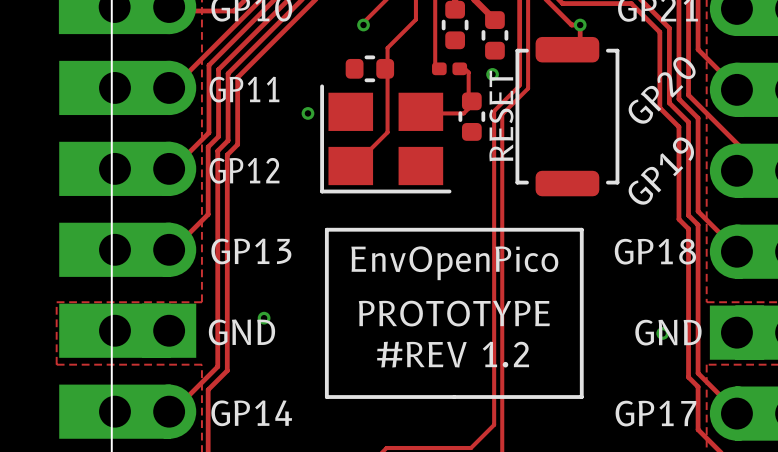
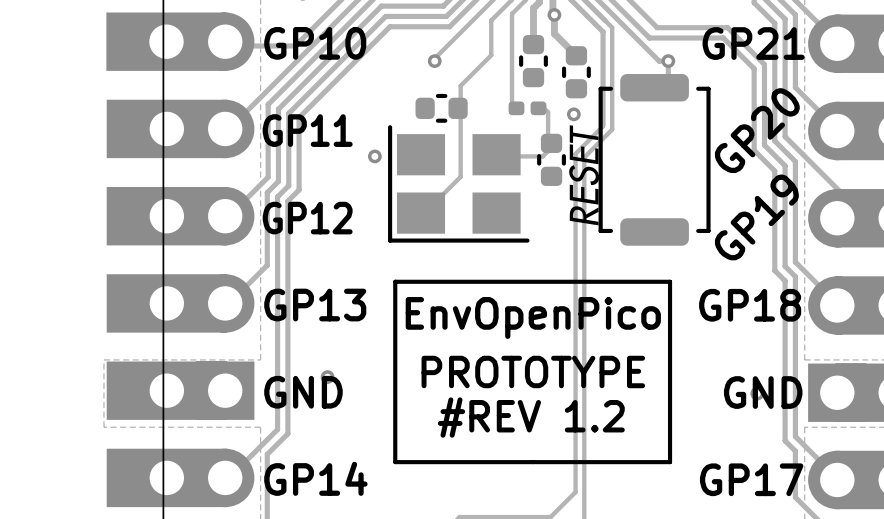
drawing: none -> [569, 125, 600, 226]
text: RESET (501, 116) -> none

